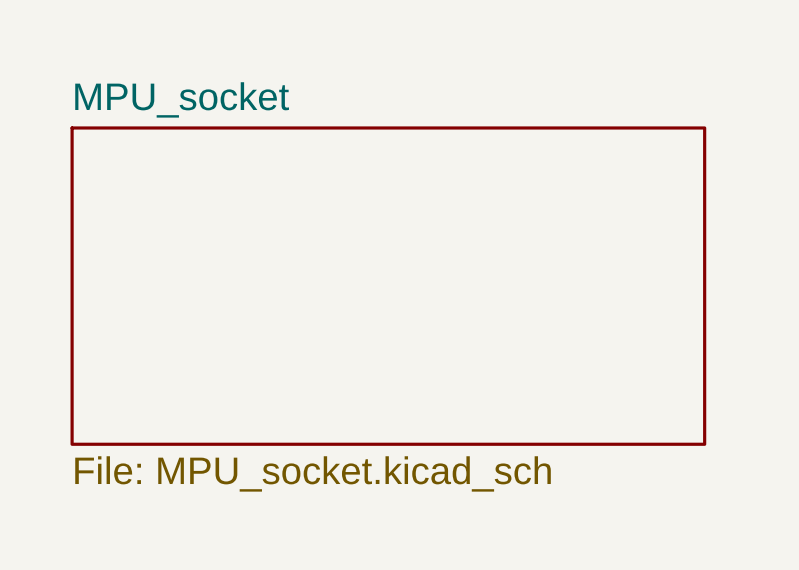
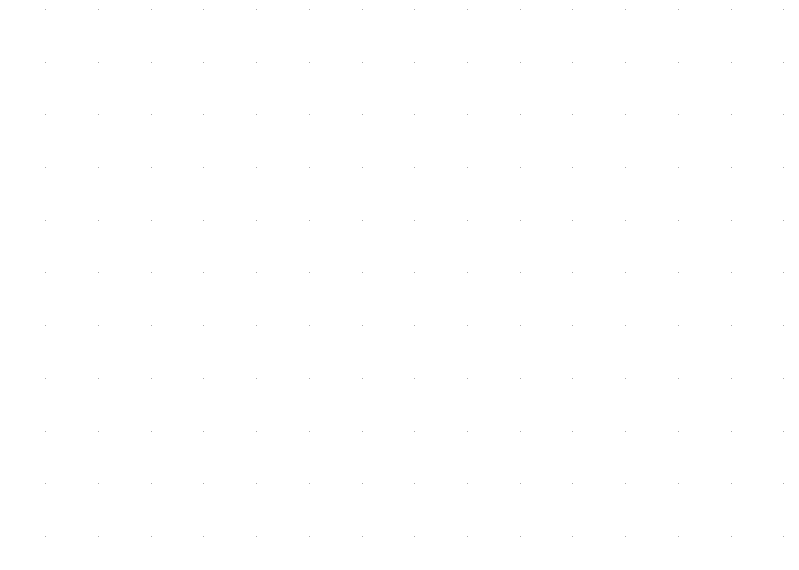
sheet MPU_socket: File: MPU_socket.kicad_sch (388, 286) -> none

